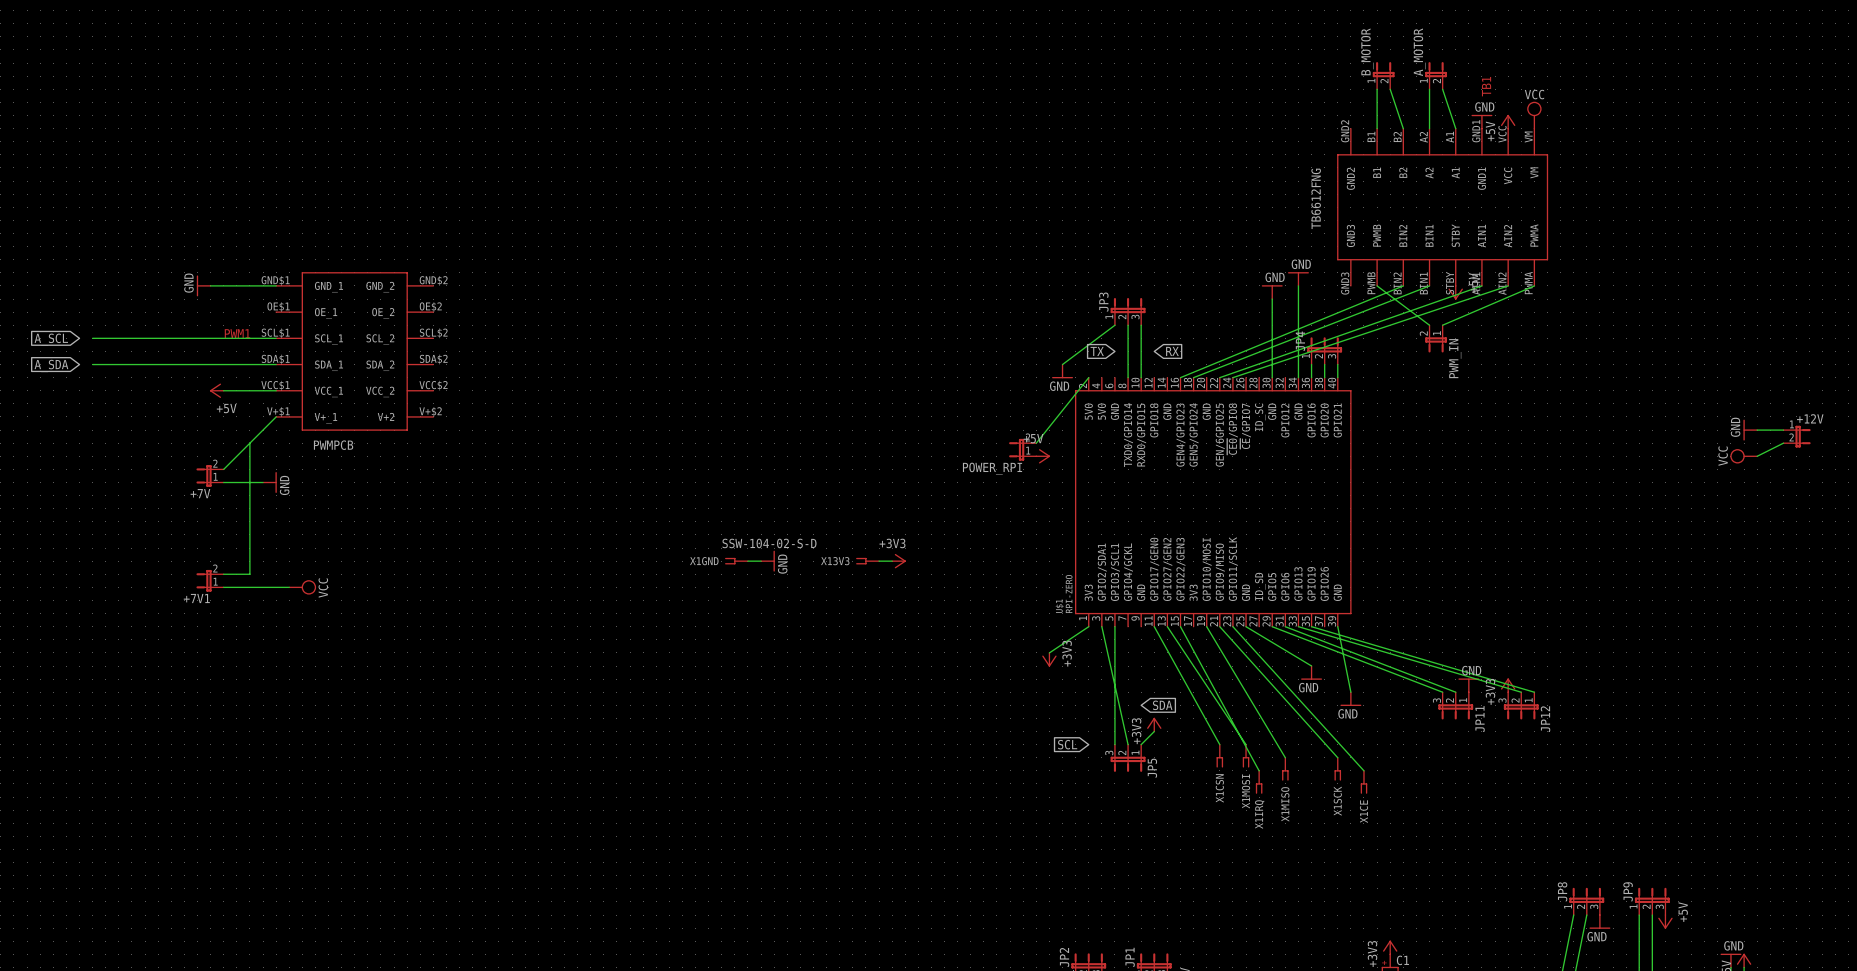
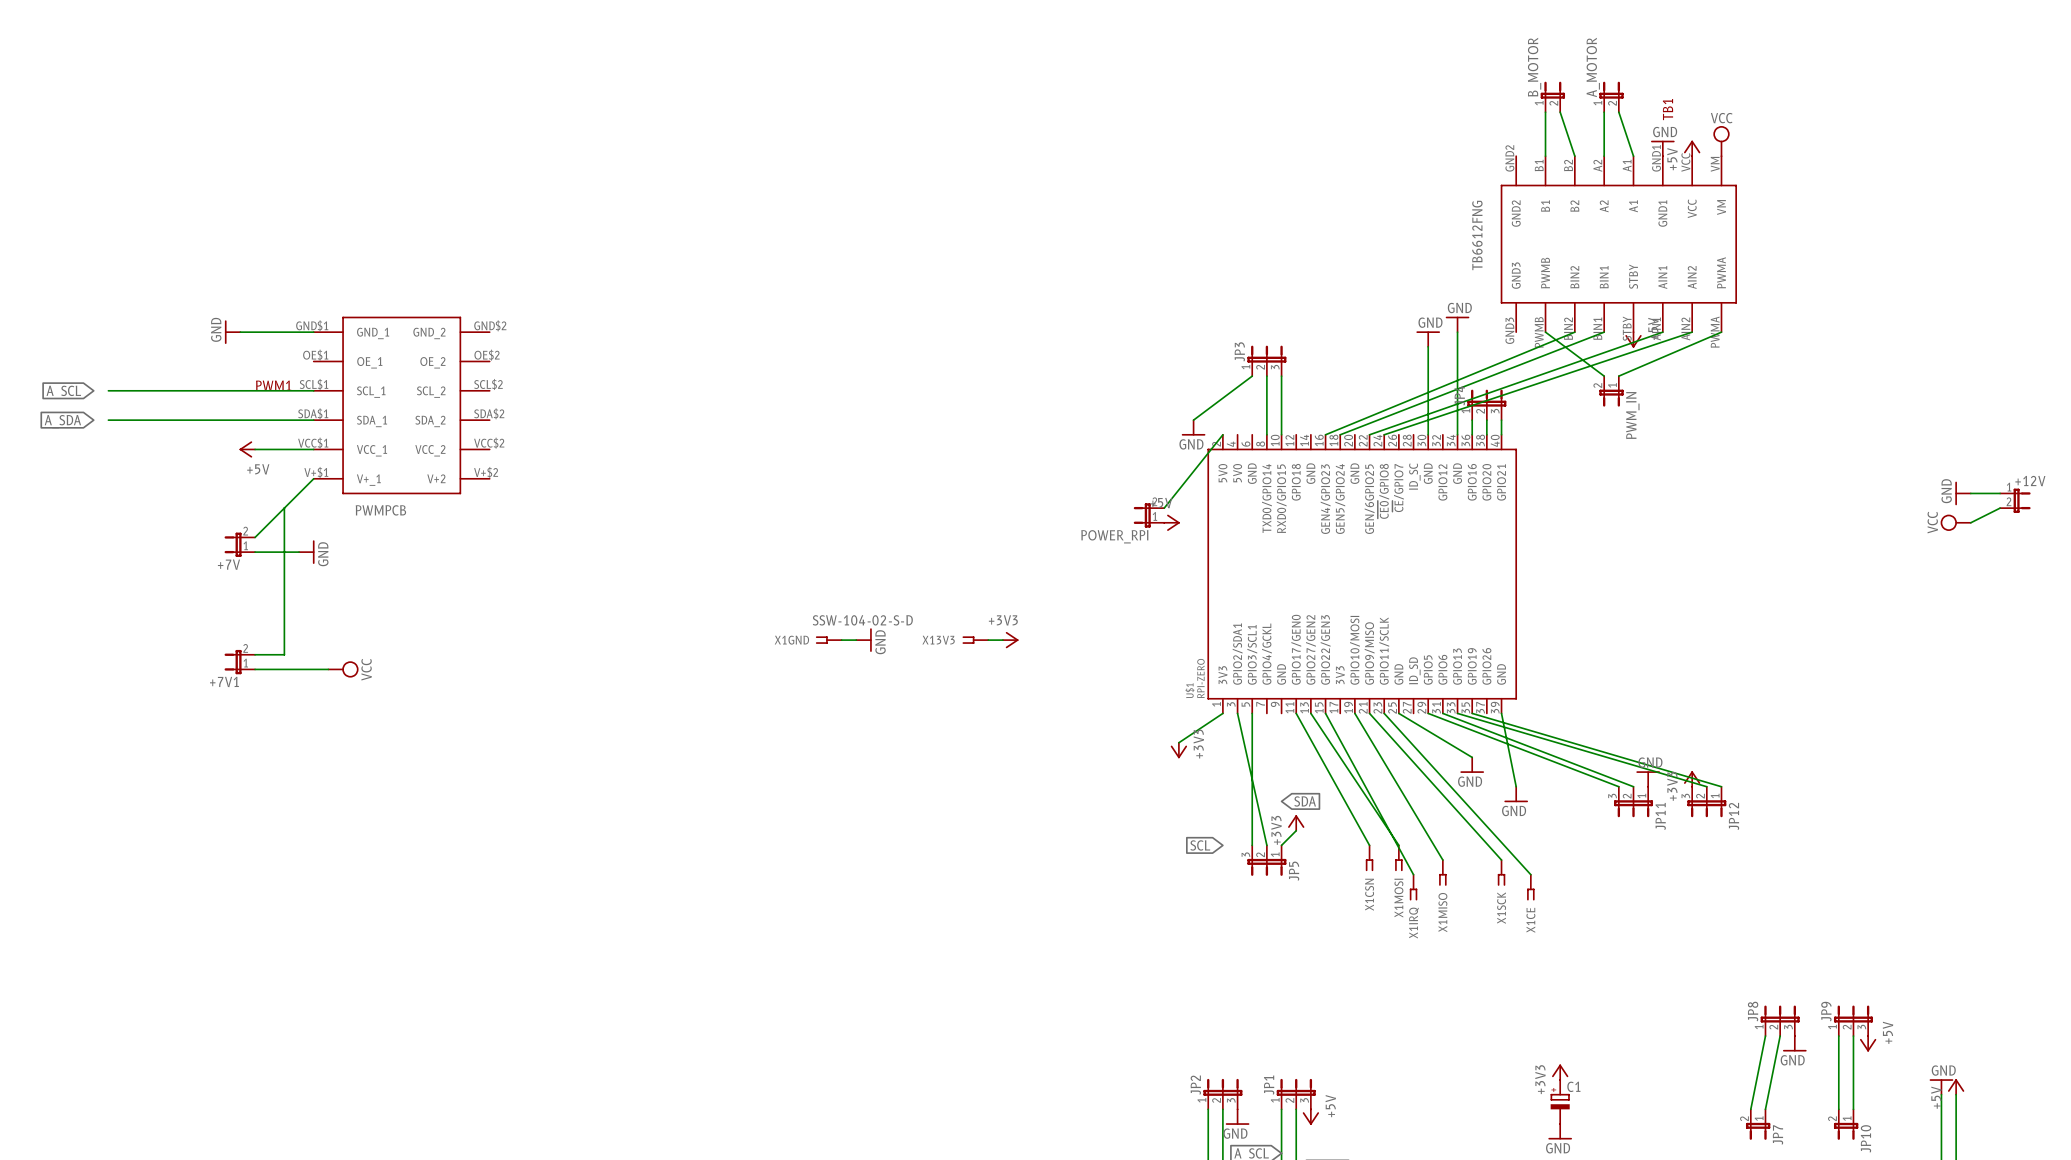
global label: TX (1097, 351) -> none
global label: RX (1172, 351) -> none

